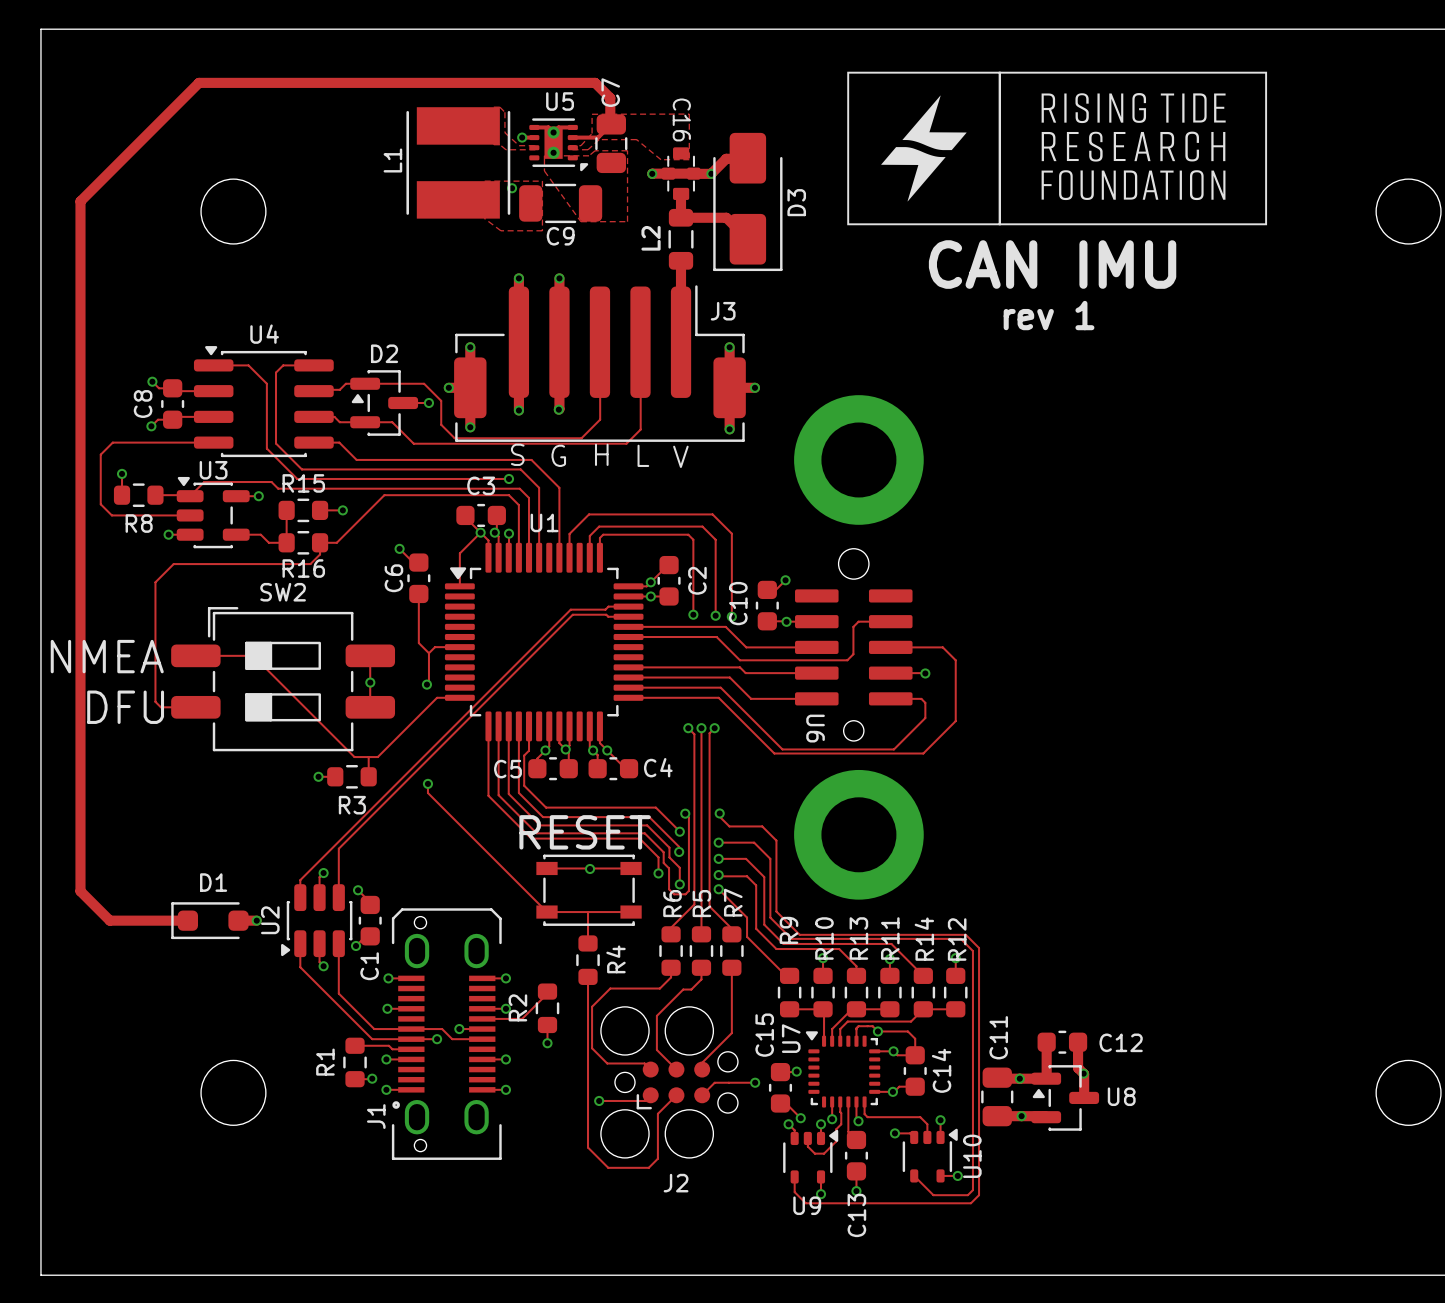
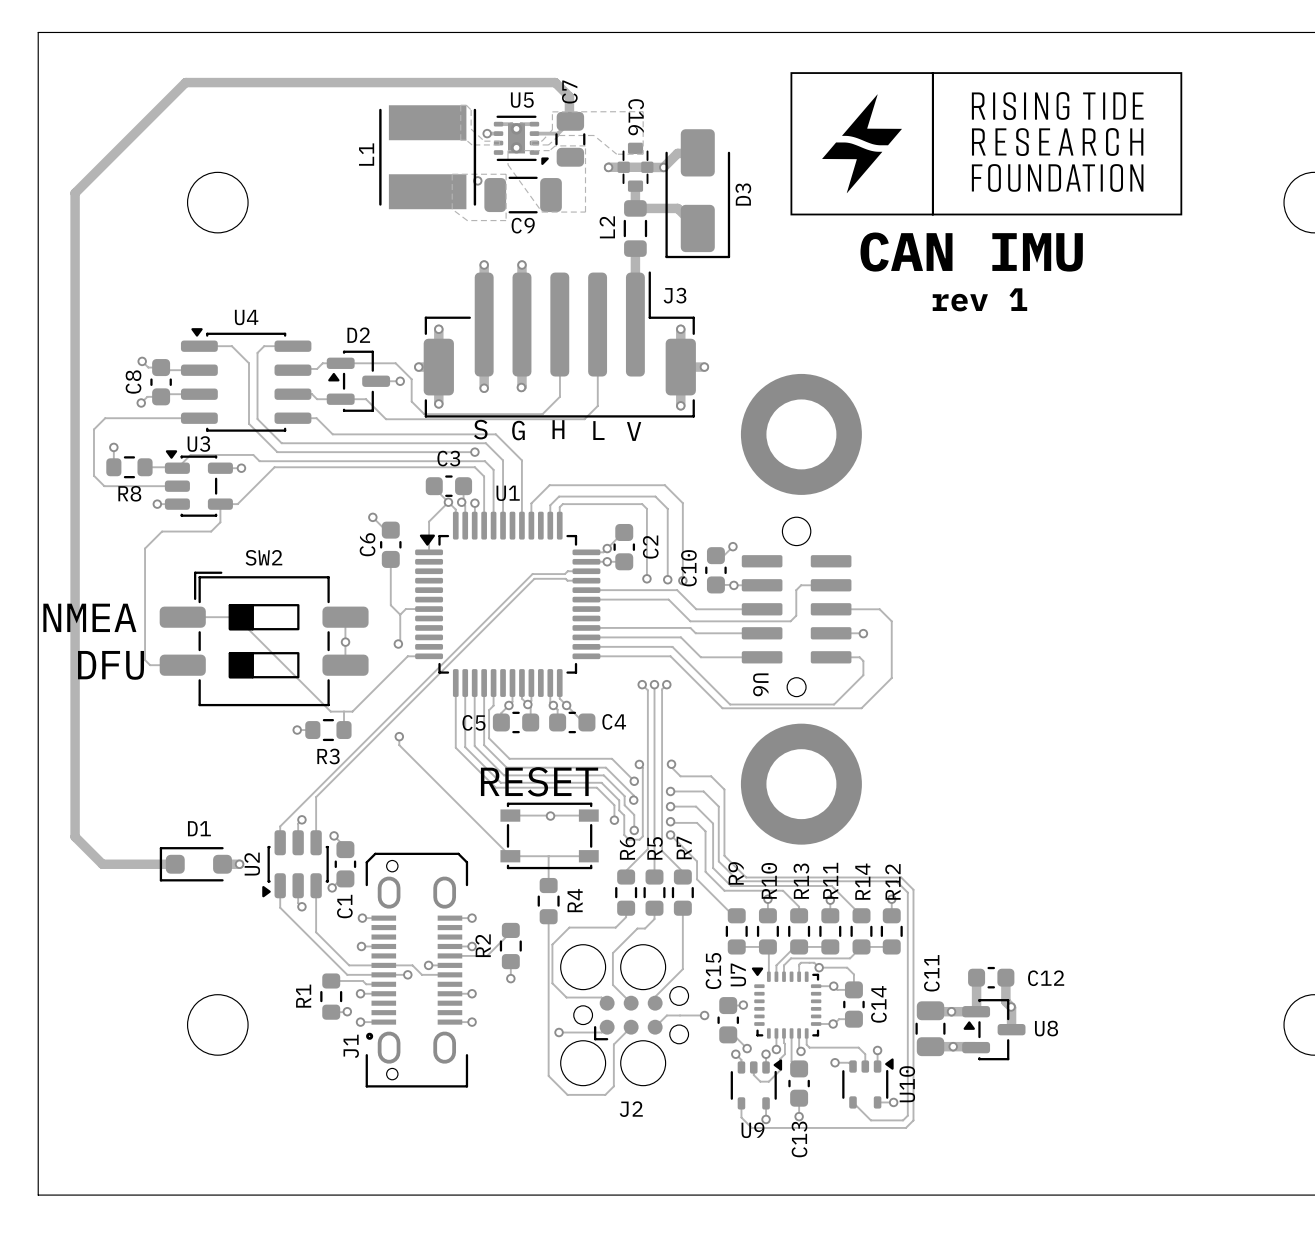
track: (384, 495) (336, 542) (320, 542) (320, 554) (310, 564) (226, 564) -> (358, 467) (274, 467) (237, 504)
track: (286, 510) (286, 542) (268, 542) (260, 534) (254, 534) -> none
R15: (303, 510) -> none
track: (320, 510) (342, 510) -> none
via: (342, 510) -> none
track: none -> (220, 504) (220, 522) (211, 531)
R16: (303, 542) -> none

